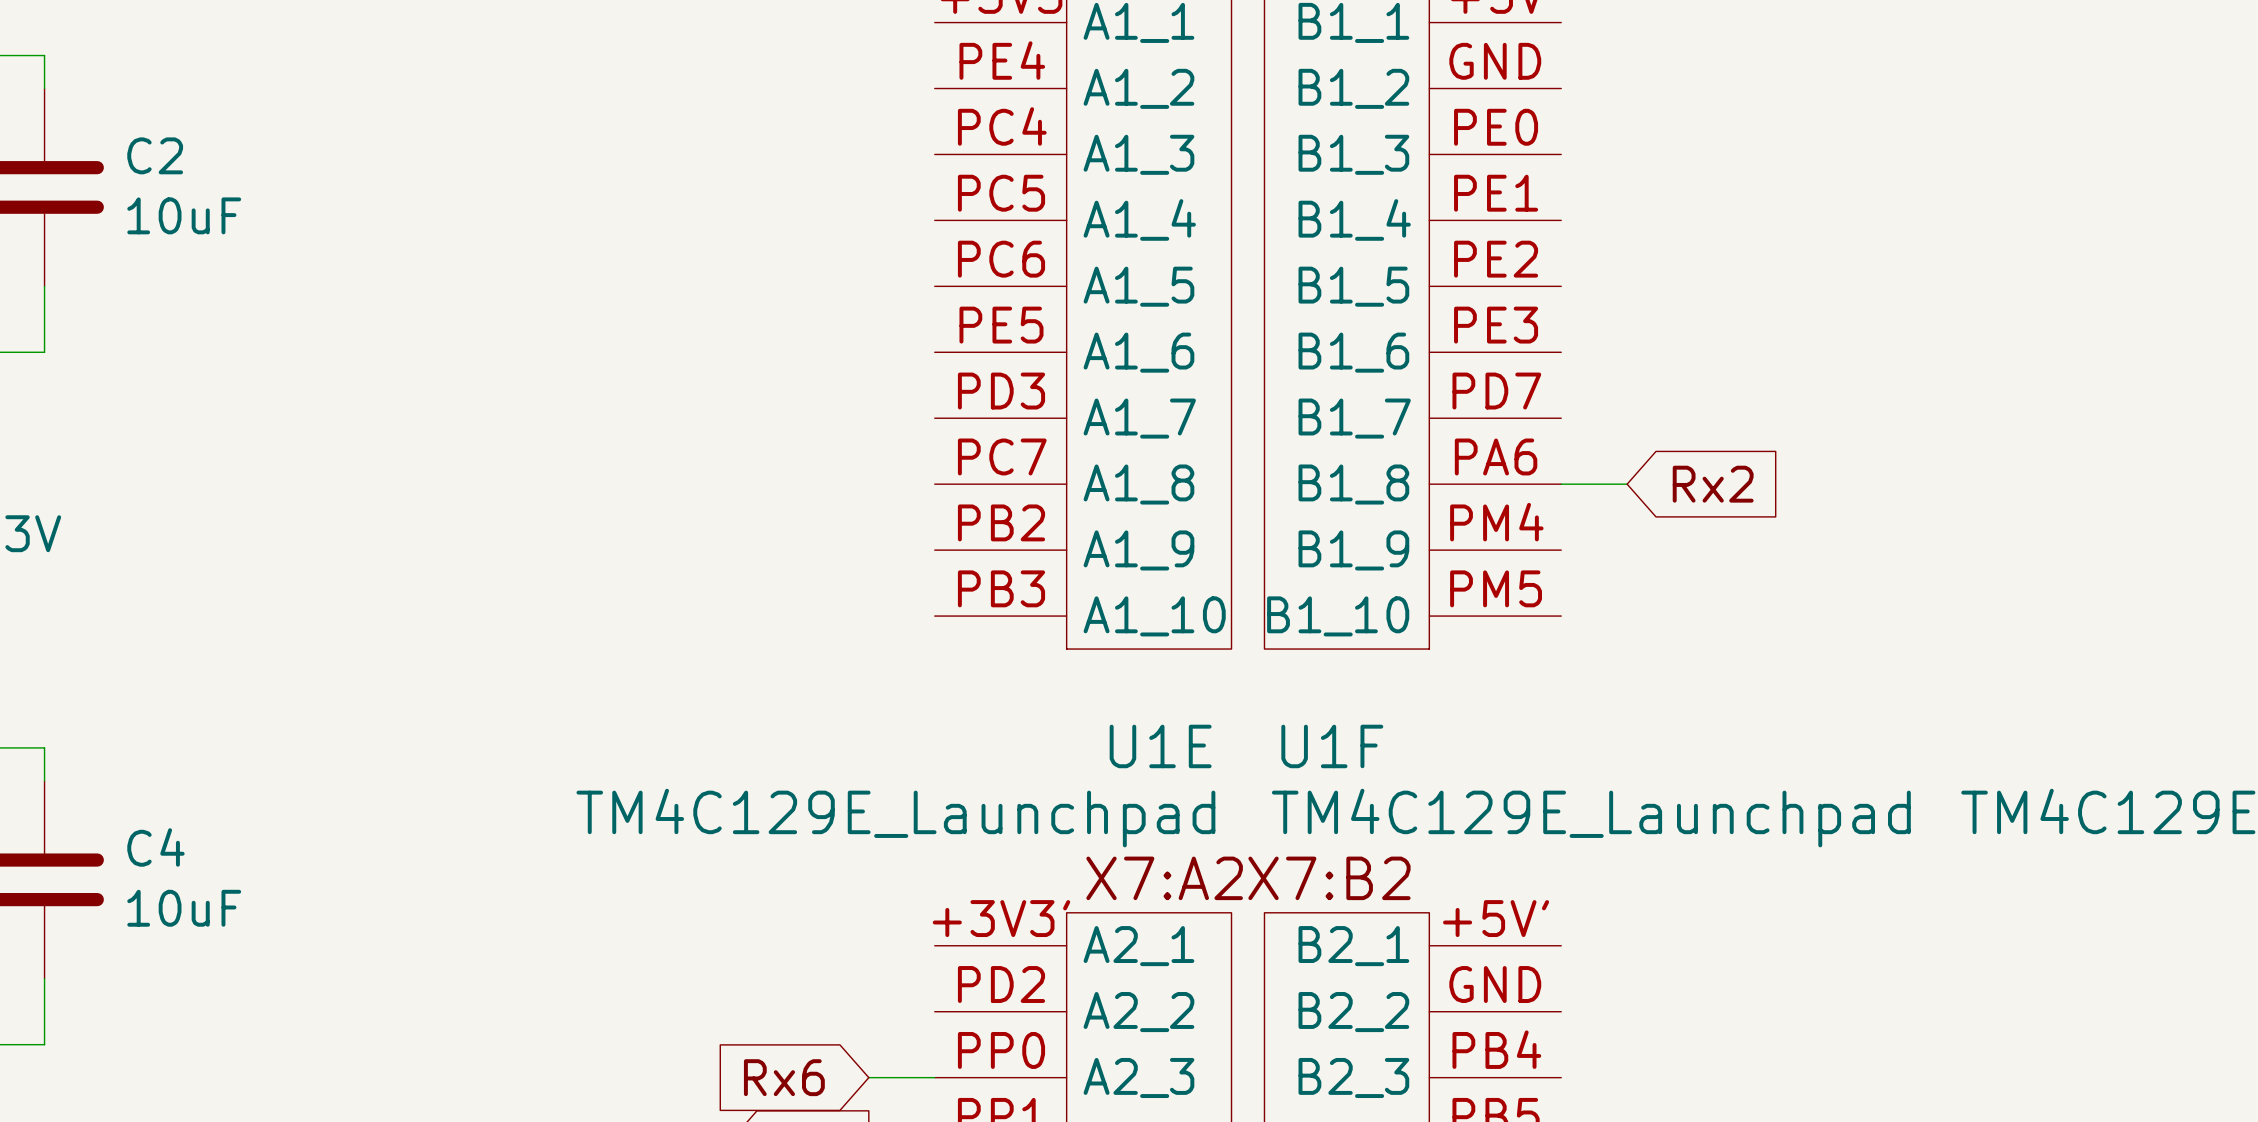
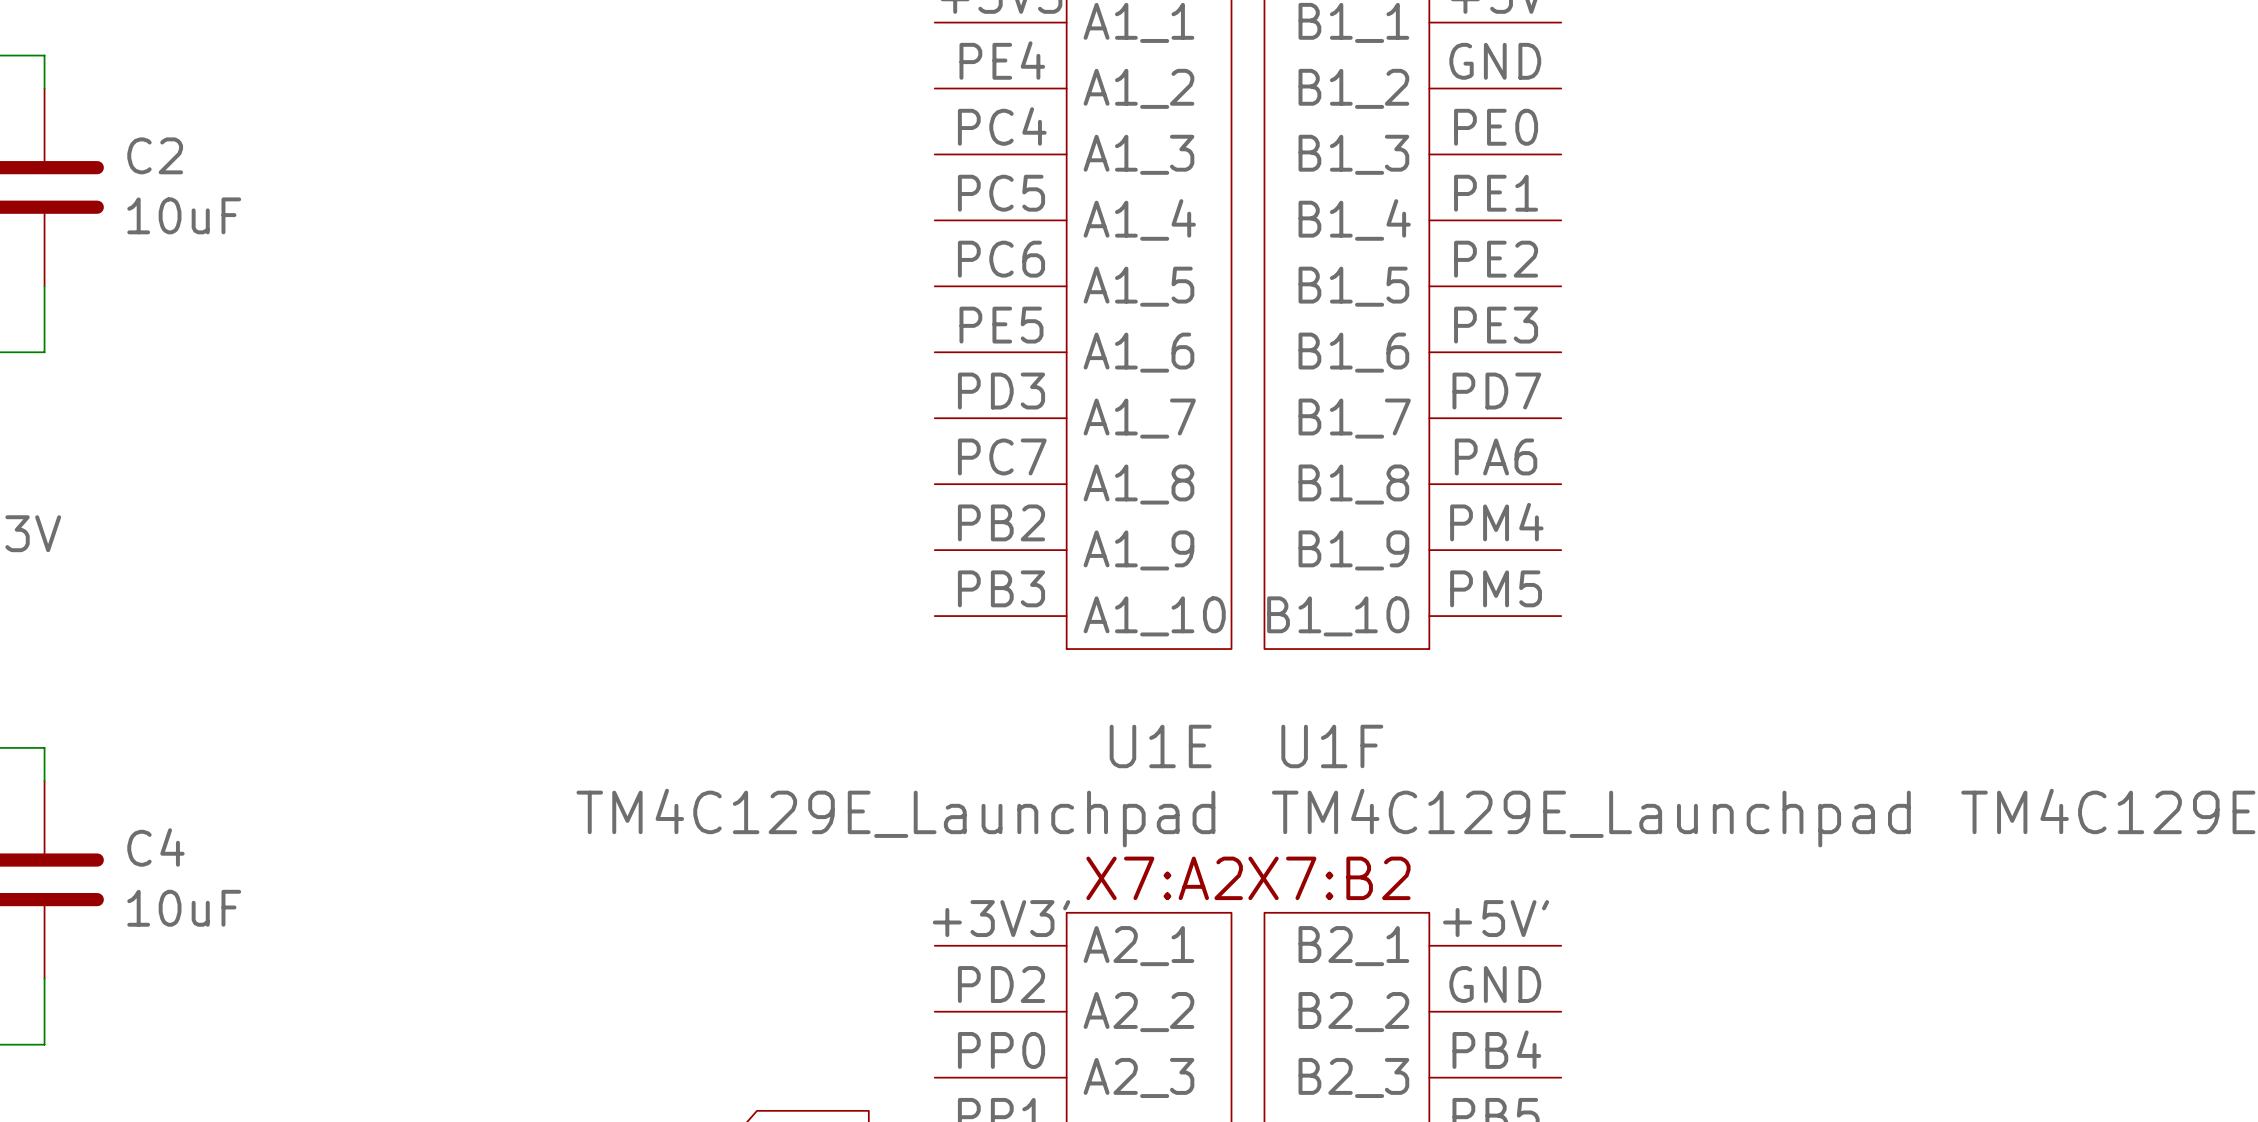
wire: (1561, 484) (1627, 484) -> none
global label: Rx2 (1713, 484) -> none
global label: Rx6 (784, 1077) -> none
wire: (868, 1077) (934, 1077) -> none

